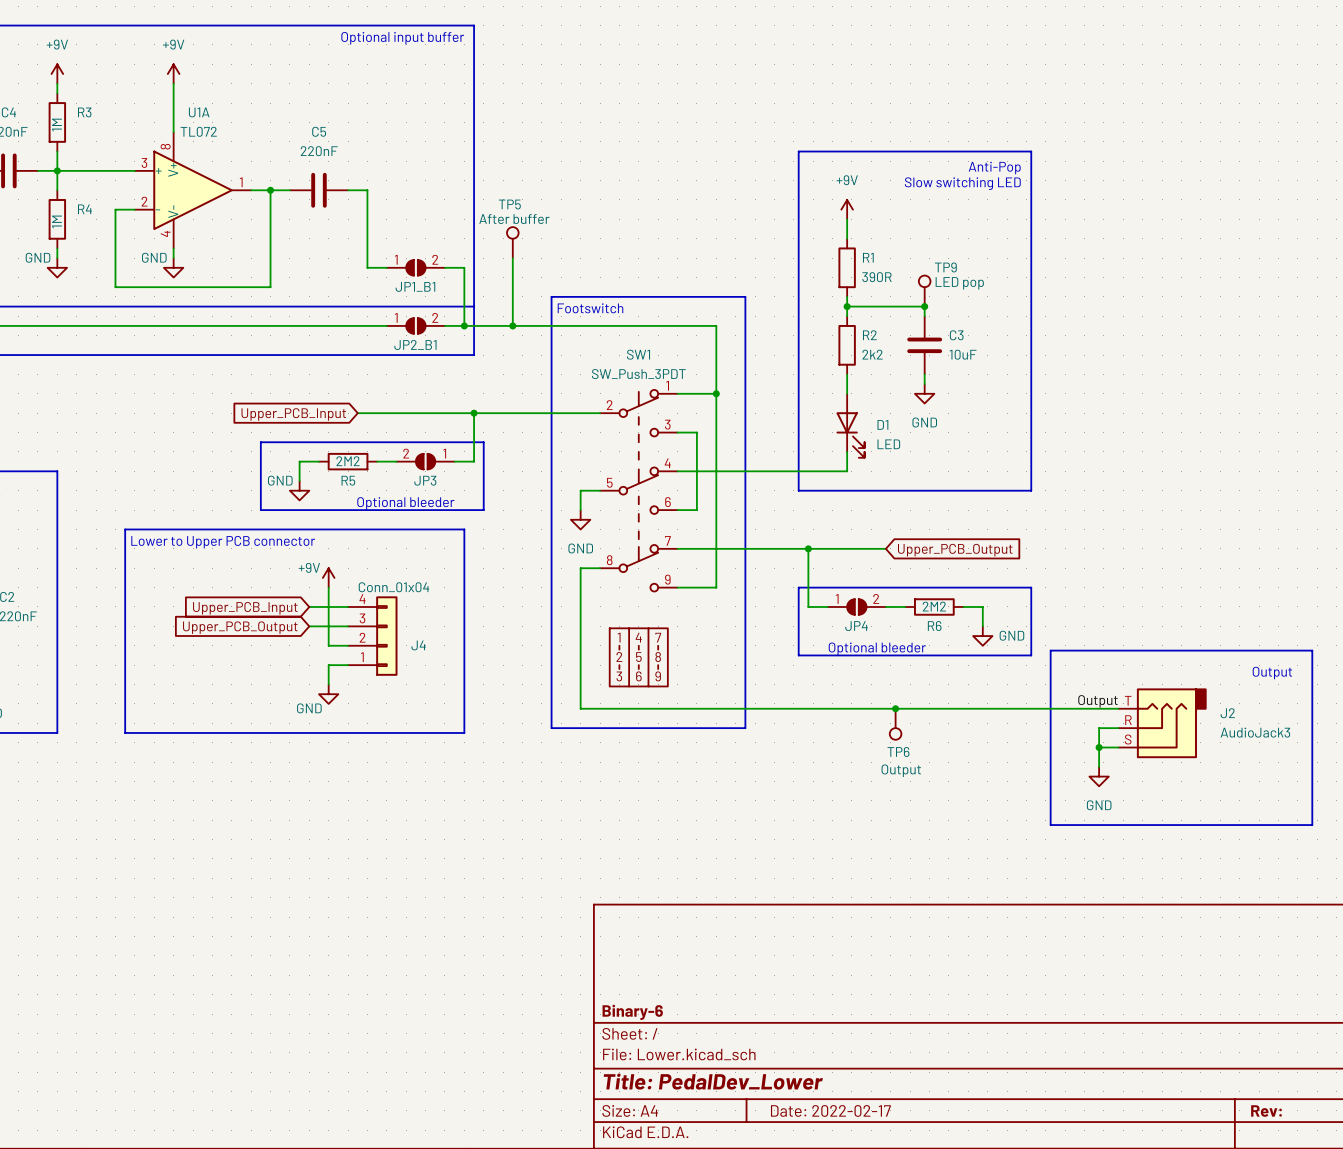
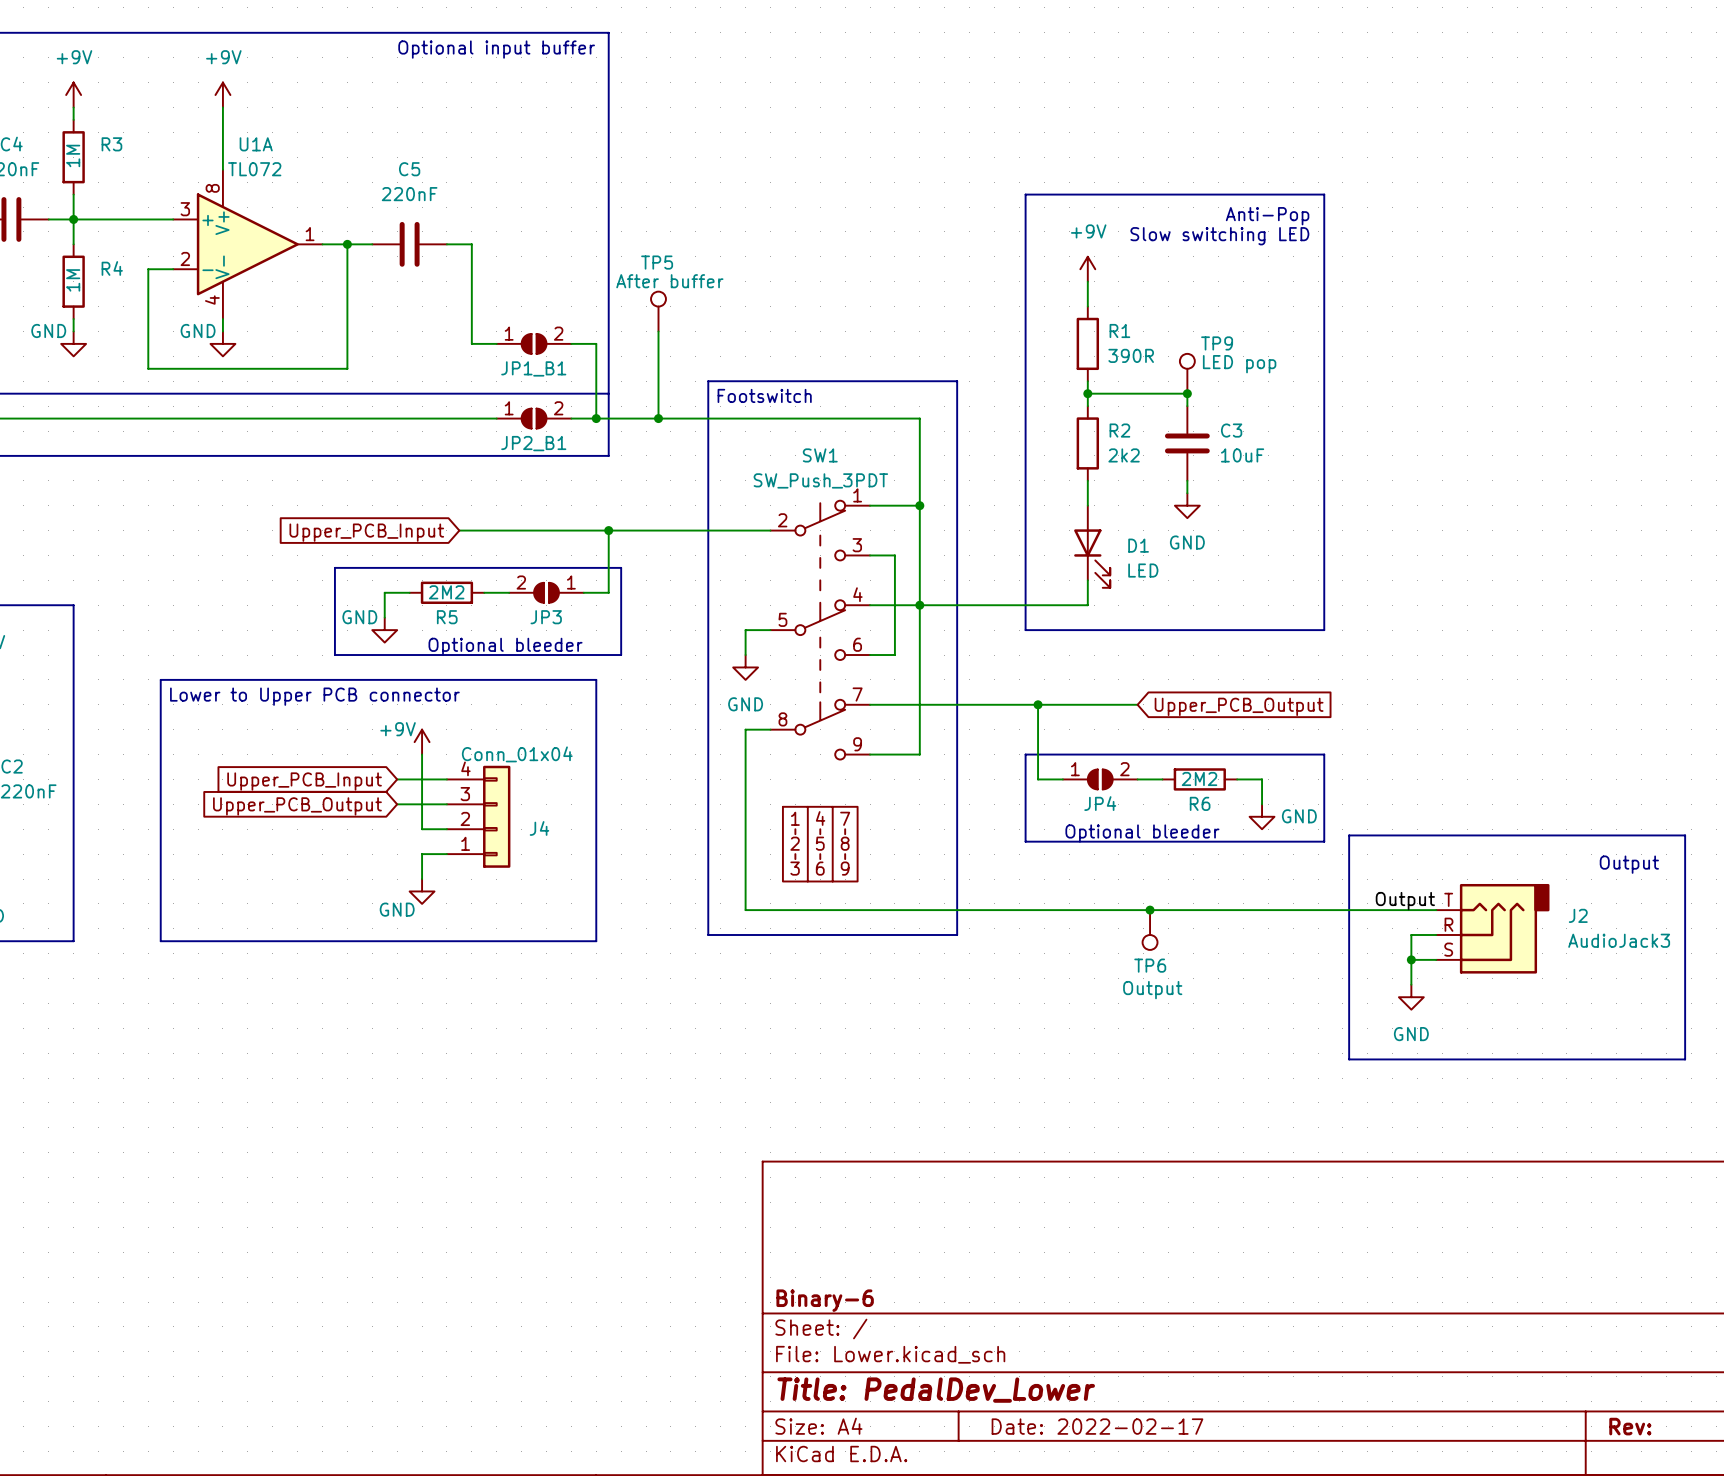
junction: none -> (919, 605)

